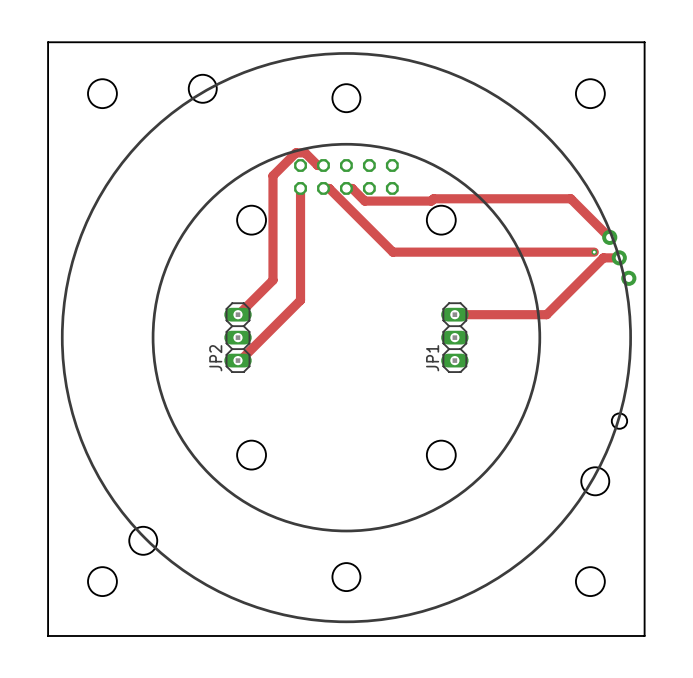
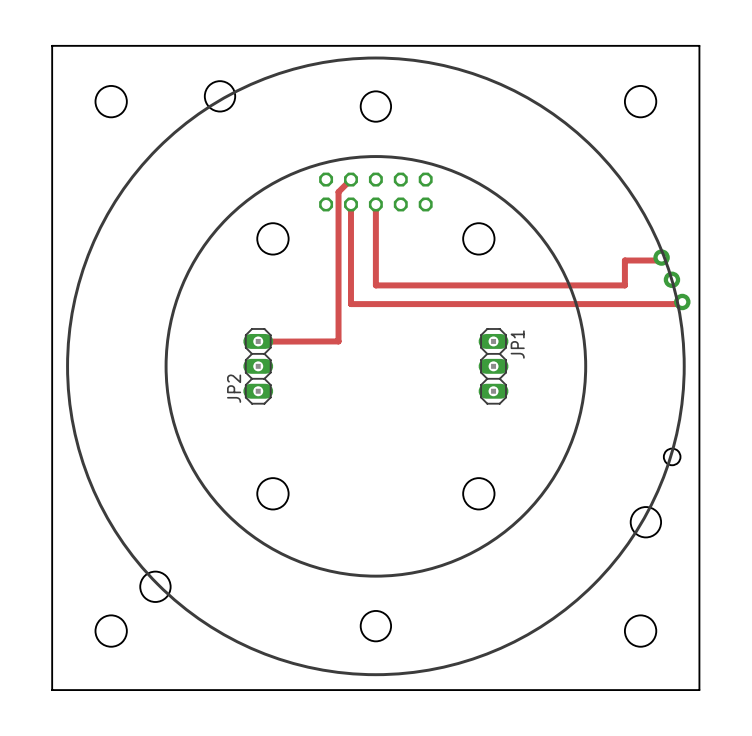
track: (323, 165) (317, 165) (305, 152) (295, 152) (272, 175) (272, 280) (238, 314) -> (350, 179) (338, 192) (338, 341) (257, 341)
track: (300, 188) (300, 300) (240, 360) (238, 360) -> none
track: (323, 188) (329, 188) (392, 252) (594, 252) -> (350, 204) (350, 304) (674, 304) (682, 301)
track: (346, 188) (352, 188) (364, 201) (431, 201) (433, 198) (570, 198) (609, 237) -> (375, 204) (375, 285) (624, 285) (624, 260) (661, 260) (661, 257)
via: (594, 252) -> none
track: (619, 257) (603, 257) (546, 314) (454, 314) -> none
JP1 name position: JP1 (432, 358) -> JP1 (517, 344)

